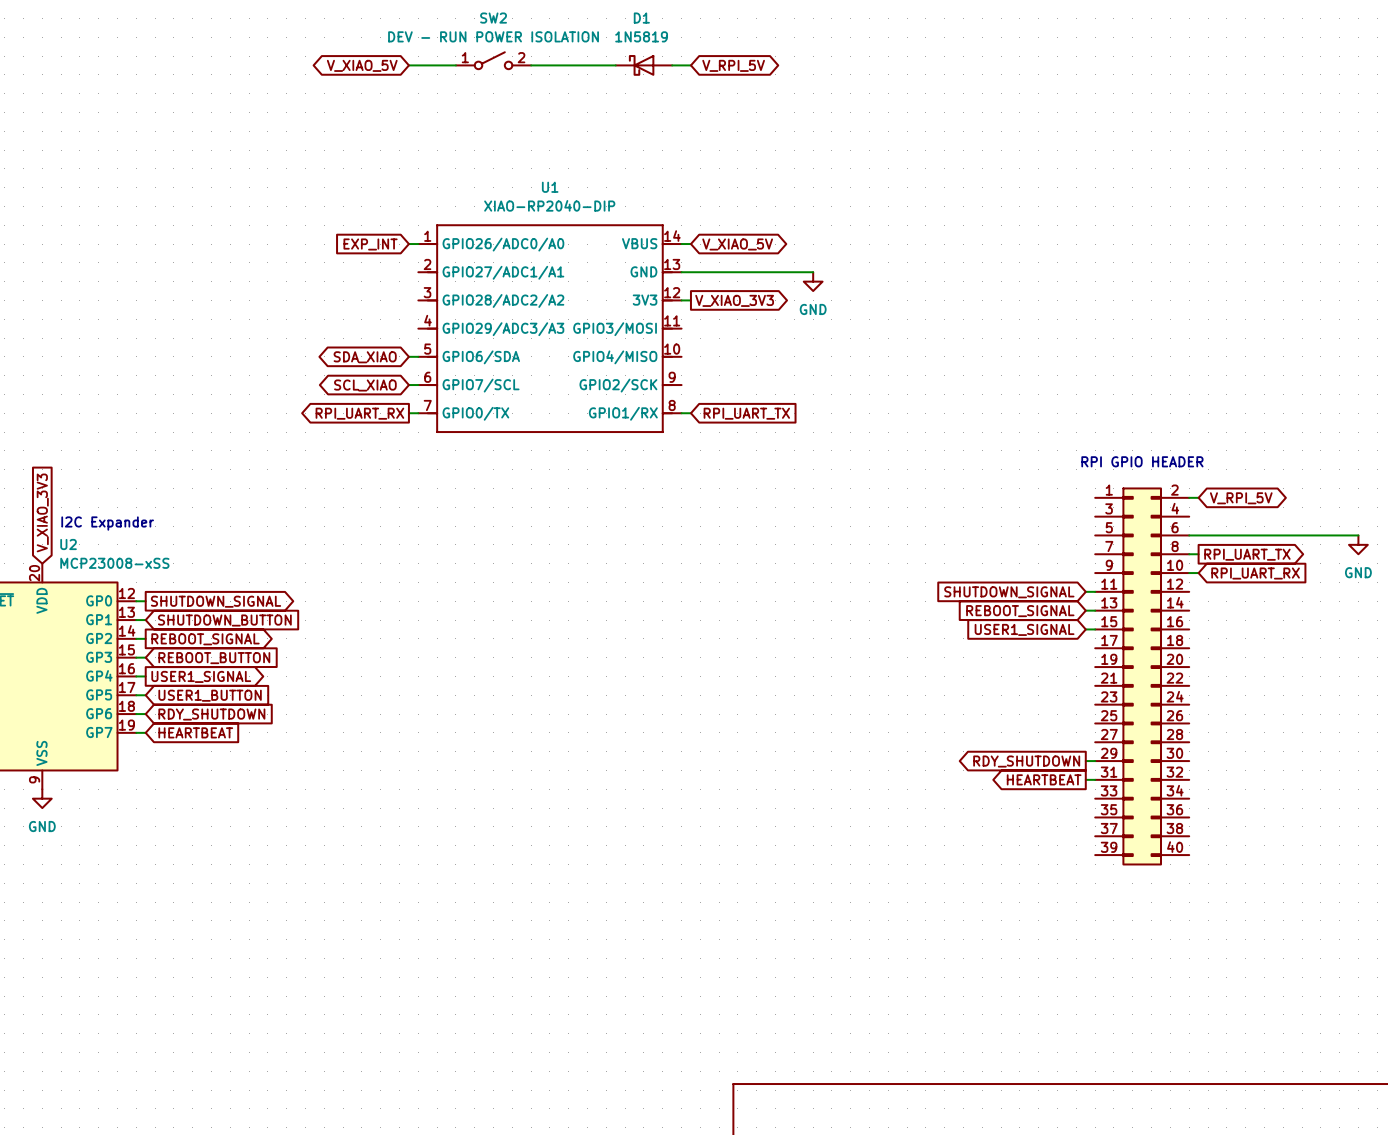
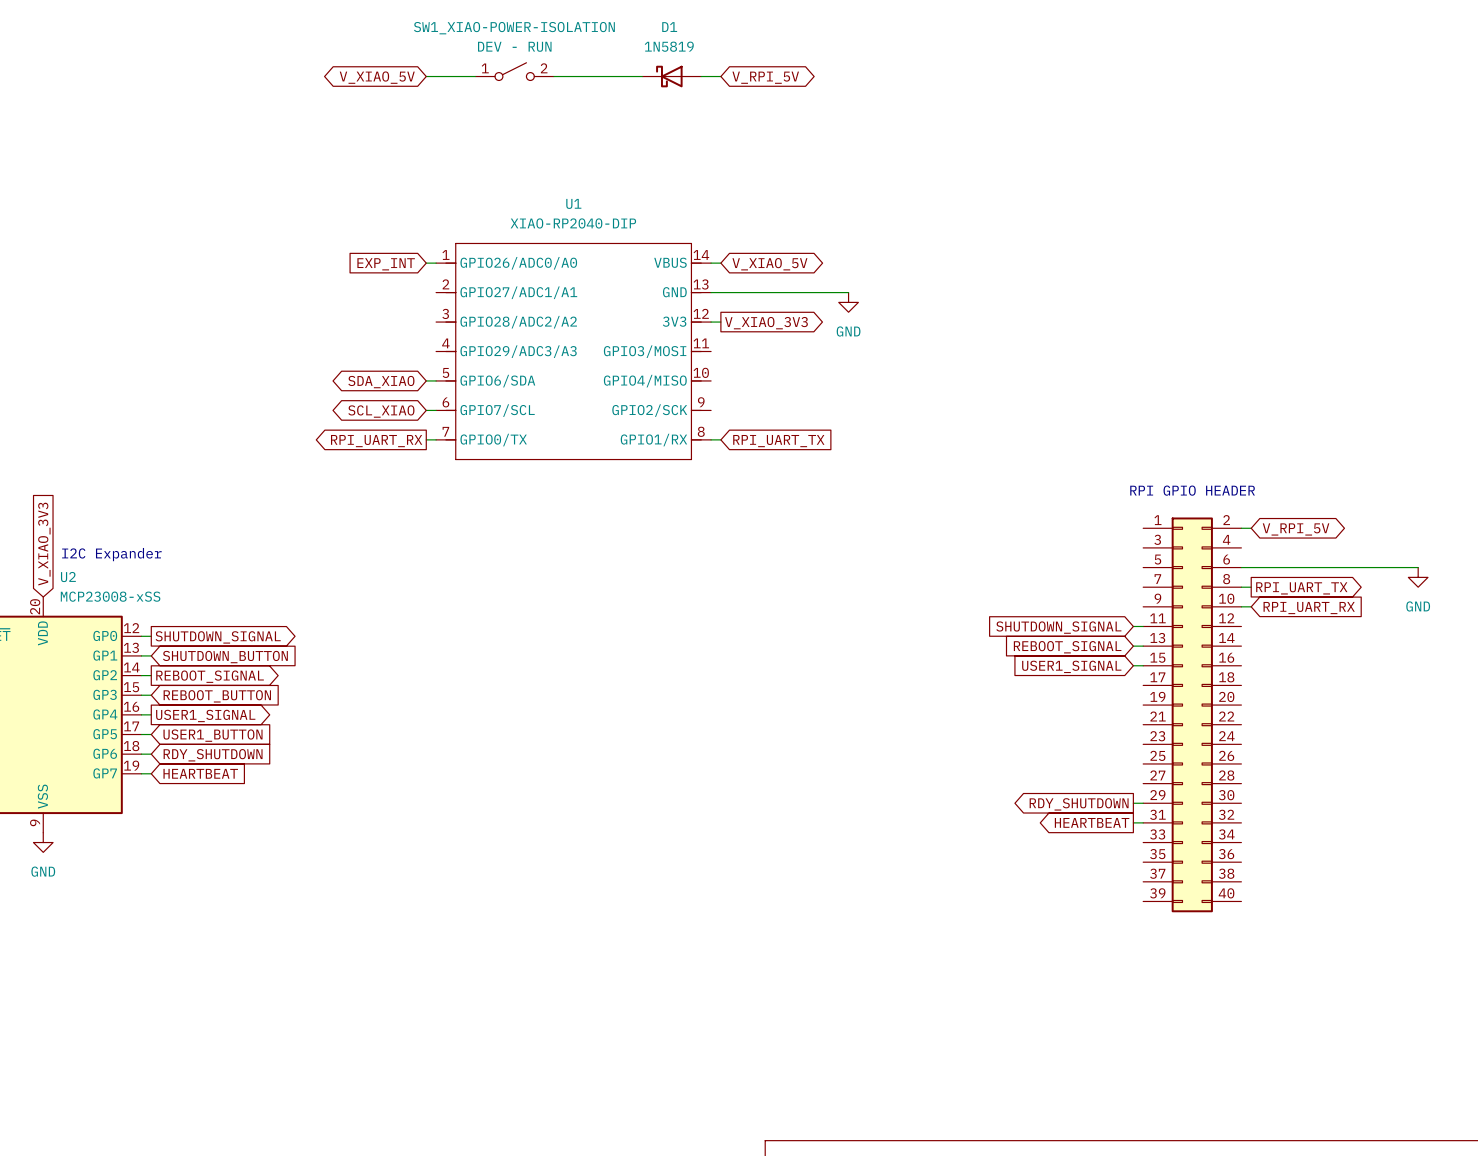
SW2 name: SW2 (493, 18) -> SW1_XIAO-POWER-ISOLATION (514, 28)
SW2 value: DEV - RUN POWER ISOLATION (493, 36) -> DEV - RUN (514, 46)

